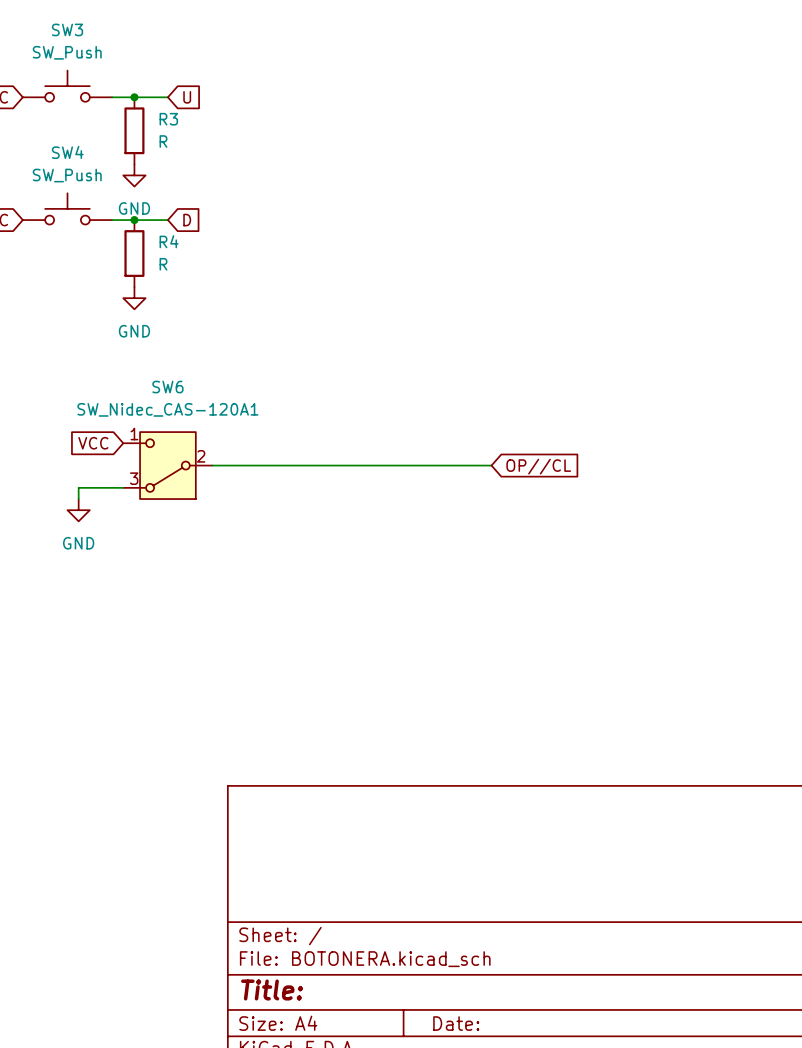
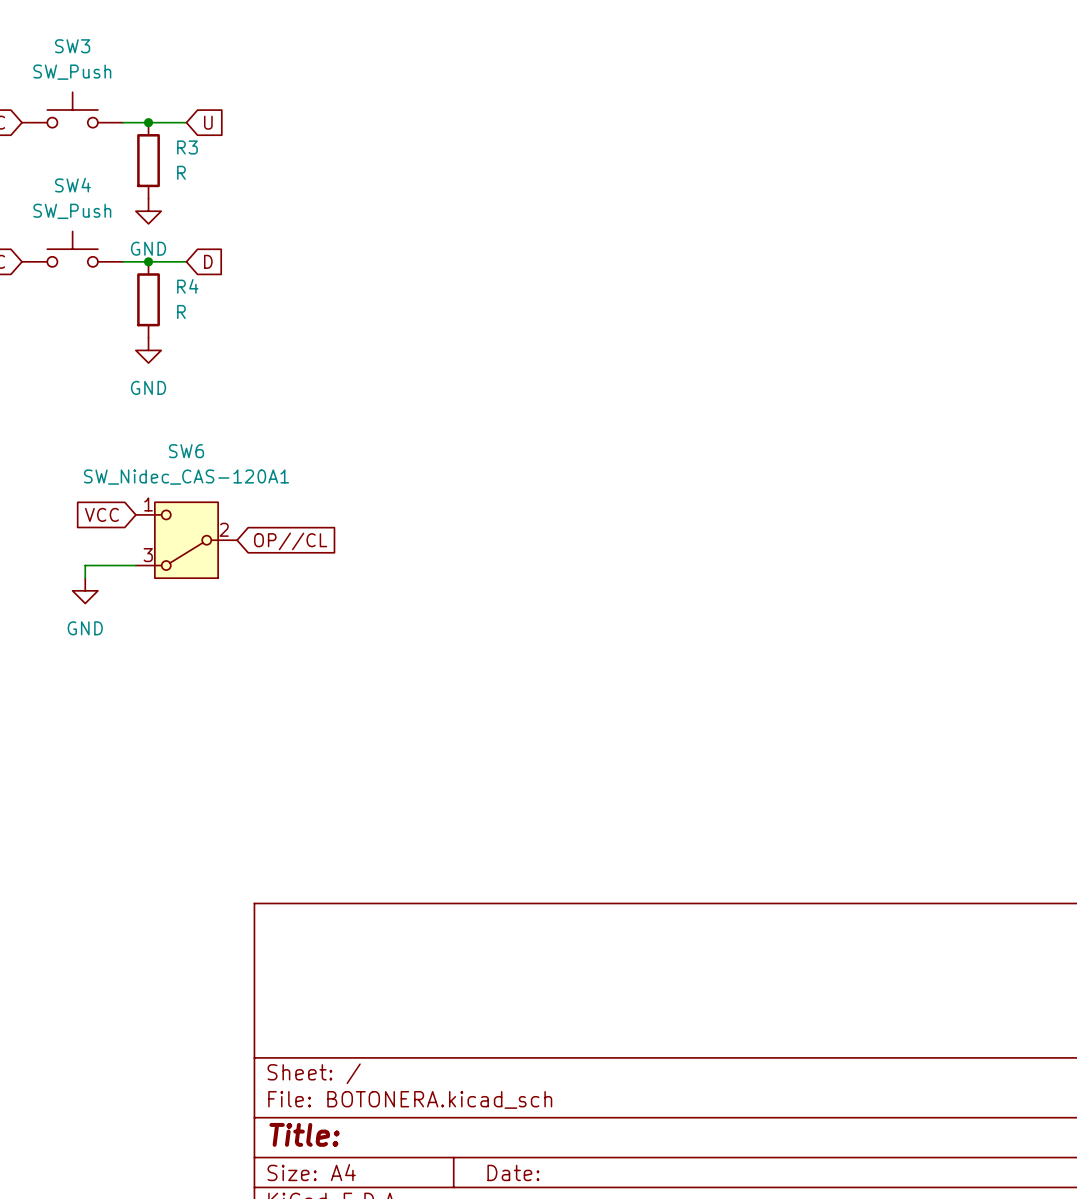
wire: (212, 465) (491, 465) -> none
global label: none -> OP//CL (290, 541)
global label: OP//CL (538, 466) -> none

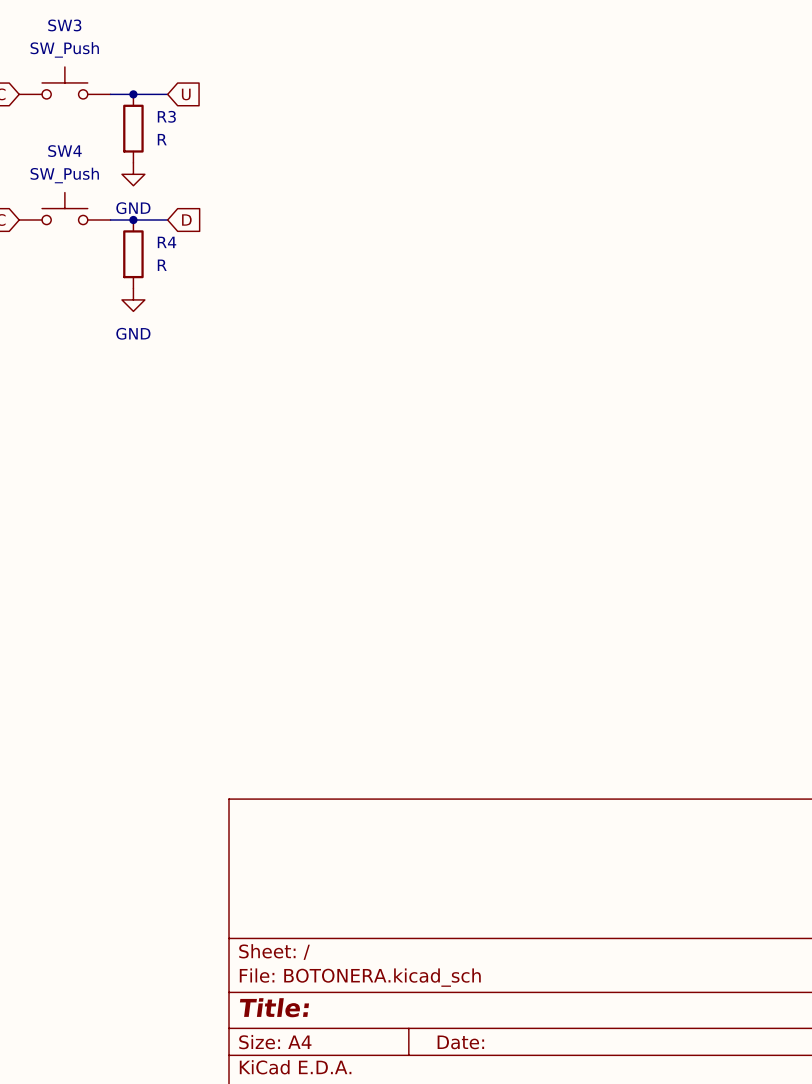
global label: VCC (101, 514) -> none
SW6: SW_Nidec_CAS-120A1 (186, 540) -> none
global label: OP//CL (290, 541) -> none
wire: (135, 565) (85, 565) (85, 578) -> none
power symbol: GND (85, 590) -> none

